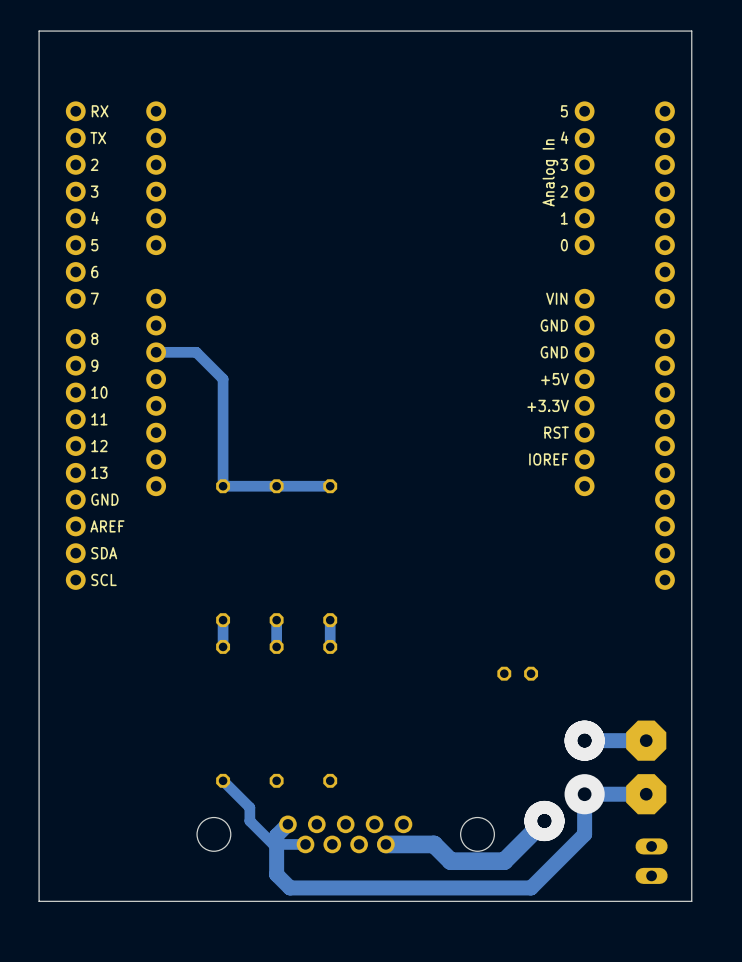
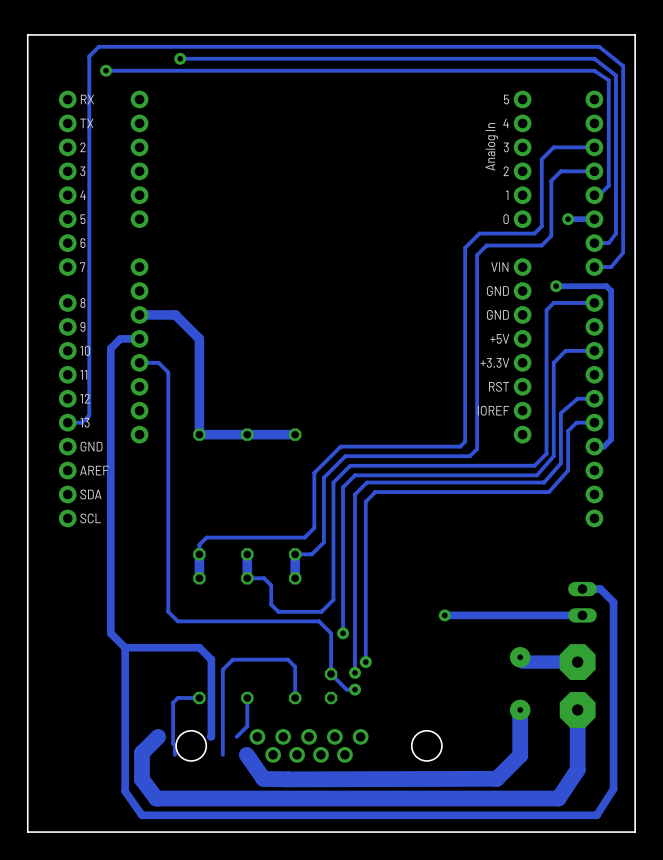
board edge: (691, 31) (39, 31) (39, 901) (691, 901) (691, 31) -> (635, 34) (635, 832) (27, 832) (27, 34) (635, 34)
track: none -> (180, 58) (594, 58) (615, 75) (615, 233) (608, 243) (594, 243)
via: none -> (180, 58)
track: none -> (106, 70) (594, 70) (608, 80) (608, 185) (599, 195) (594, 195)
via: none -> (106, 70)
track: none -> (594, 147) (553, 147) (541, 159) (541, 226) (534, 233) (479, 233) (465, 247) (465, 441) (460, 446) (340, 446) (314, 472) (314, 528) (304, 537) (206, 537) (199, 544) (199, 554)
track: none -> (594, 171) (560, 171) (551, 180) (551, 235) (541, 245) (486, 245) (477, 255) (477, 449) (469, 456) (345, 456) (323, 477) (323, 542) (311, 554) (295, 554)
via: none -> (568, 219)
track: none -> (594, 219) (568, 219)
track: none -> (594, 267) (611, 267) (623, 252) (623, 65) (599, 46) (98, 46) (89, 56) (89, 415) (82, 422) (67, 422)
track: none -> (556, 286) (606, 286) (611, 291) (611, 439) (604, 446) (594, 446)
via: none -> (556, 286)
track: none -> (594, 302) (553, 302) (546, 310) (546, 453) (534, 465) (350, 465) (333, 482) (333, 599) (321, 611) (278, 611) (271, 604) (271, 585) (264, 578) (247, 578)
track: none -> (139, 338) (120, 338) (110, 348) (110, 633) (125, 647)
track: none -> (594, 350) (565, 350) (553, 362) (553, 456) (536, 475) (355, 475) (343, 487) (343, 633)
track: none -> (139, 362) (158, 362) (168, 372) (168, 611) (177, 621) (319, 621) (331, 633) (331, 674) (346, 689) (355, 689)
track: none -> (594, 398) (577, 398) (560, 413) (560, 463) (544, 482) (366, 482) (355, 494) (355, 672)
track: none -> (594, 422) (576, 422) (568, 431) (568, 470) (548, 492) (375, 492) (365, 501) (365, 662)
track: none -> (582, 589) (600, 589) (613, 602) (613, 788) (596, 815) (141, 815) (125, 791) (125, 647)
part rotation: 0° (517, 673) -> 90° clockwise (331, 686)
part position: (517, 673) -> (331, 686)
via: none -> (444, 615)
track: none -> (582, 615) (444, 615)
via: none -> (343, 633)
via size: [564, 720, 605, 761] -> [509, 647, 531, 668]
track: none -> (125, 647) (199, 647) (211, 659) (210, 736)
via: none -> (365, 662)
via: none -> (355, 672)
via: none -> (355, 689)
via size: [564, 774, 605, 815] -> [509, 699, 531, 721]
track: (223, 780) (249, 807) (249, 821) (273, 844) (305, 844) -> (199, 697) (177, 697) (173, 702) (174, 754)
track: none -> (247, 697) (247, 726) (236, 736)
track: none -> (295, 697) (295, 666) (287, 659) (232, 659) (222, 669) (222, 754)
track: none -> (520, 709) (520, 755) (496, 778) (263, 778) (246, 754)
track: (646, 794) (584, 794) (584, 834) (531, 887) (290, 887) (276, 874) (276, 835) (287, 824) -> (577, 709) (577, 769) (558, 798) (156, 798) (141, 779) (141, 753) (158, 736)
track: (544, 821) (504, 861) (450, 861) (433, 844) (385, 844) -> none
via: (544, 821) -> none
part position: (651, 861) -> (582, 602)

